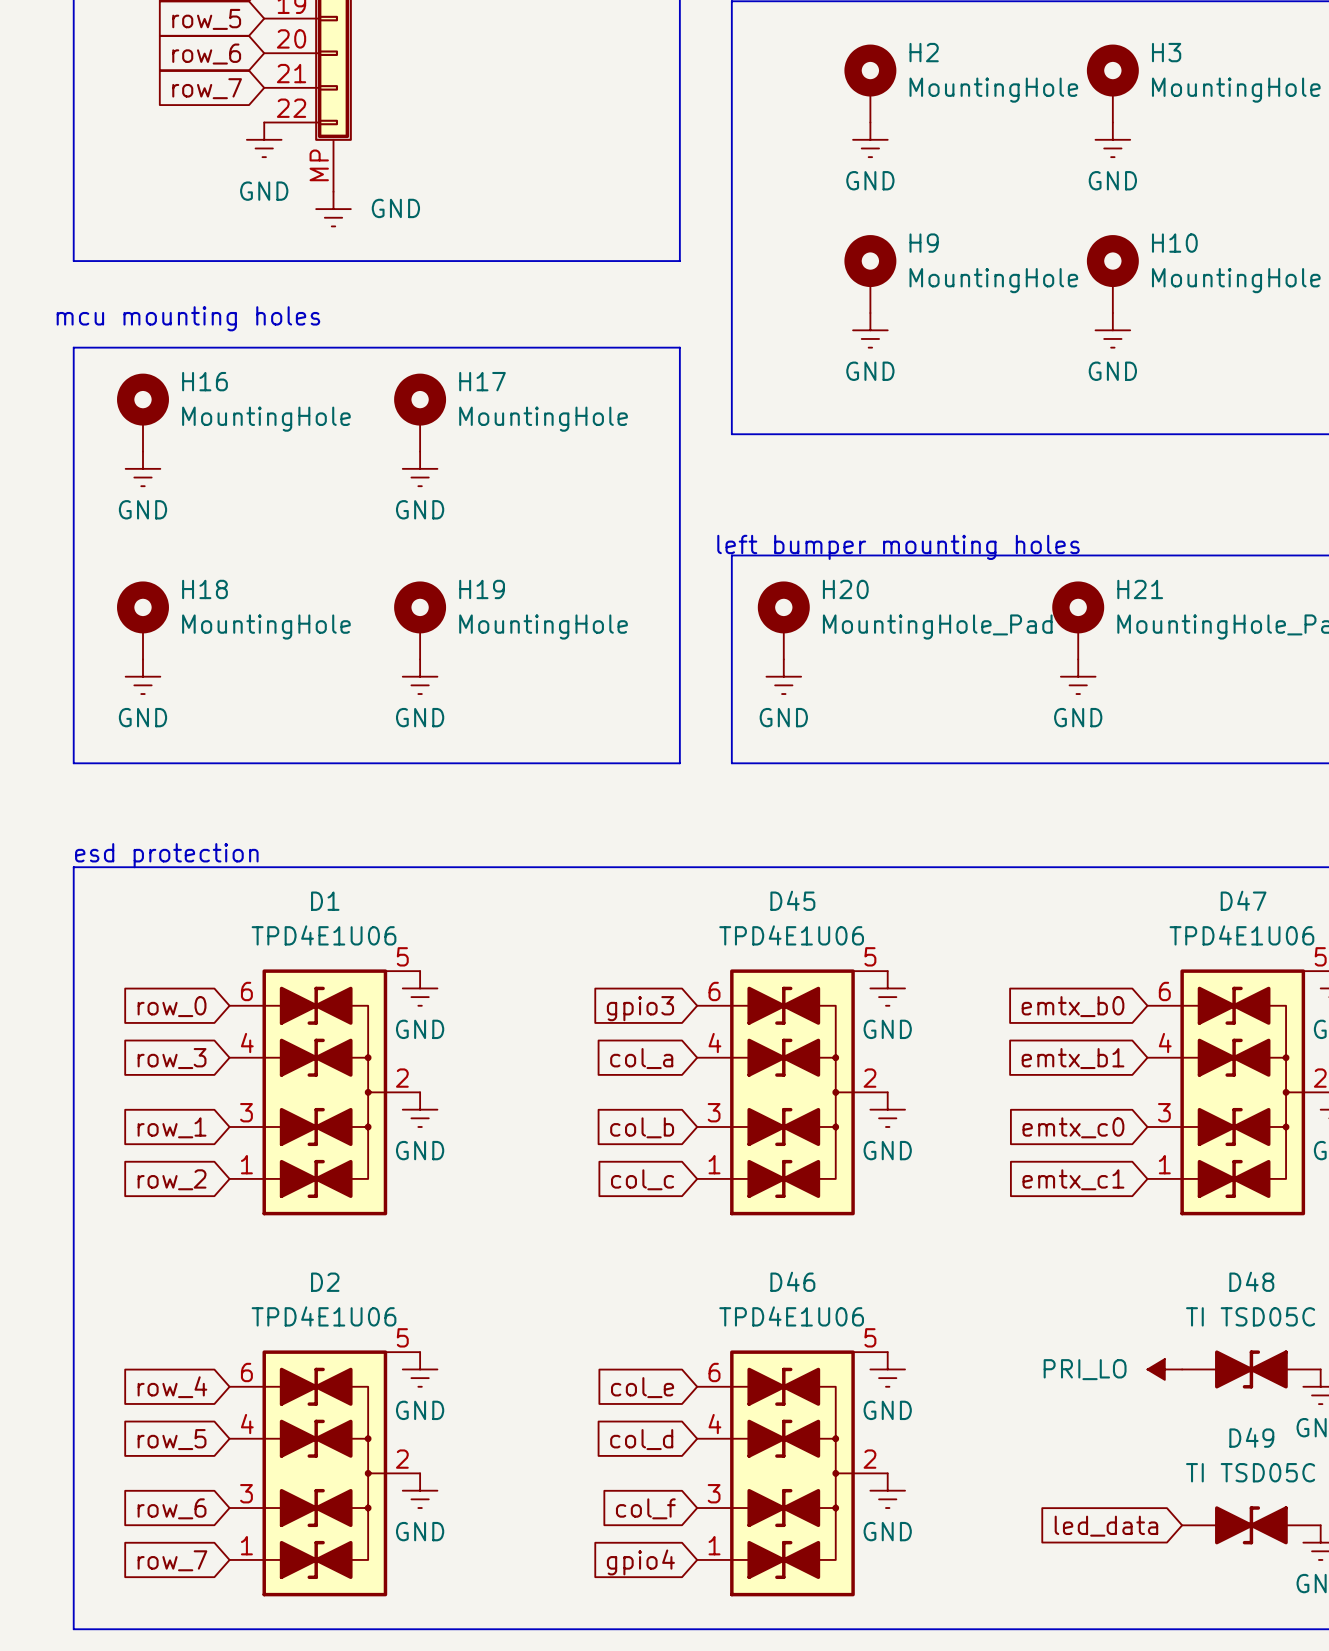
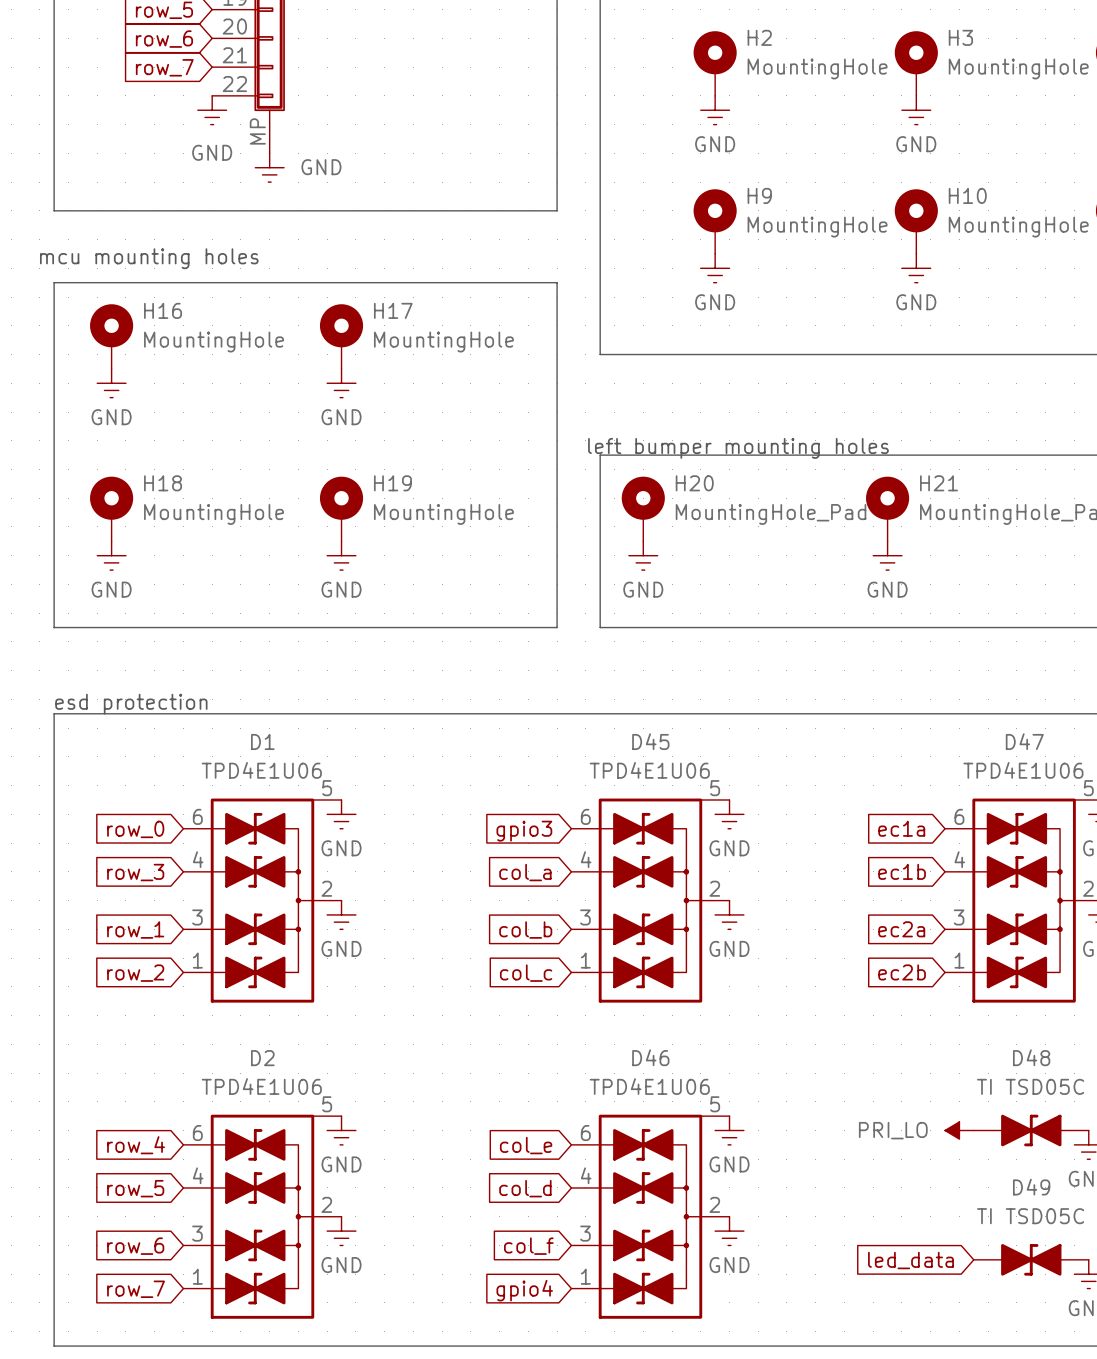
global label: emtx_b0 (1073, 1006) -> ec1a (901, 828)
global label: emtx_b1 (1073, 1058) -> ec1b (902, 871)
global label: emtx_c0 (1073, 1127) -> ec2a (901, 929)
global label: emtx_c1 (1073, 1179) -> ec2b (902, 972)

